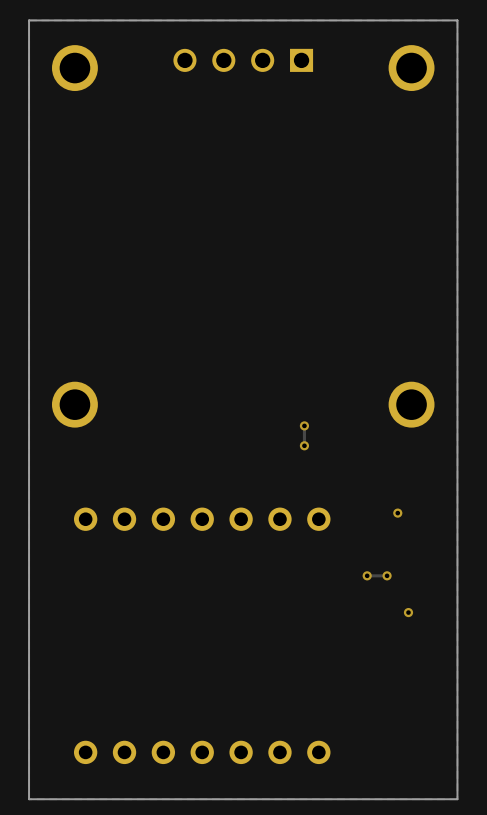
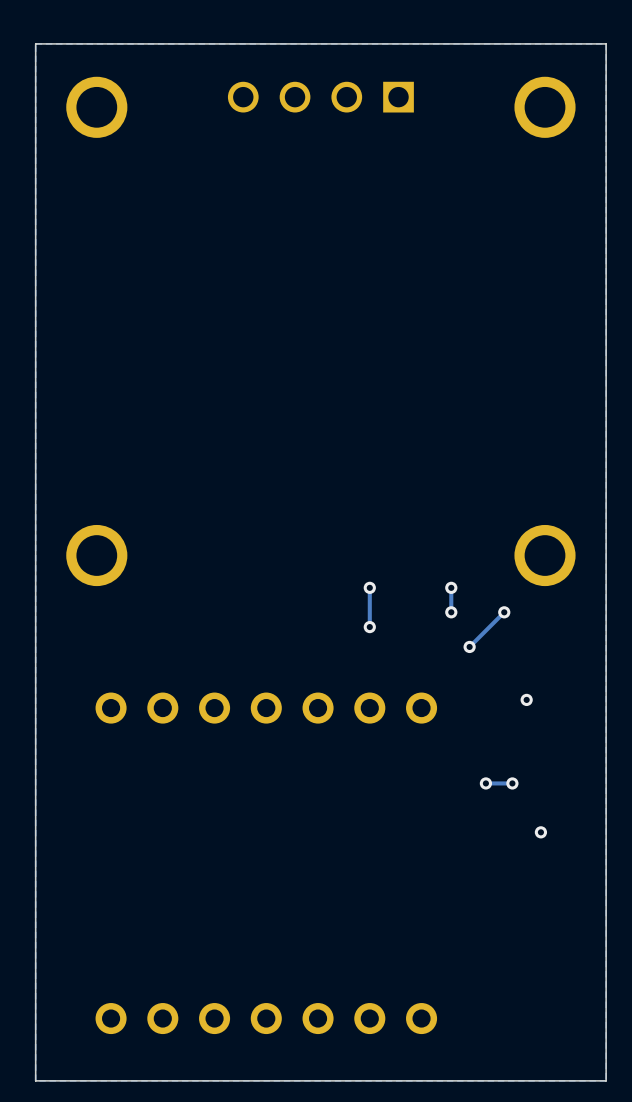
track: (304, 425) (304, 445) -> none
via: (304, 425) -> none
track: none -> (369, 587) (369, 627)
via: none -> (369, 587)
track: none -> (451, 587) (451, 612)
via: none -> (451, 587)
via: (304, 445) -> none
via: none -> (451, 612)
track: none -> (504, 612) (469, 646)
via: none -> (504, 612)
via: none -> (369, 627)
via: none -> (469, 646)

